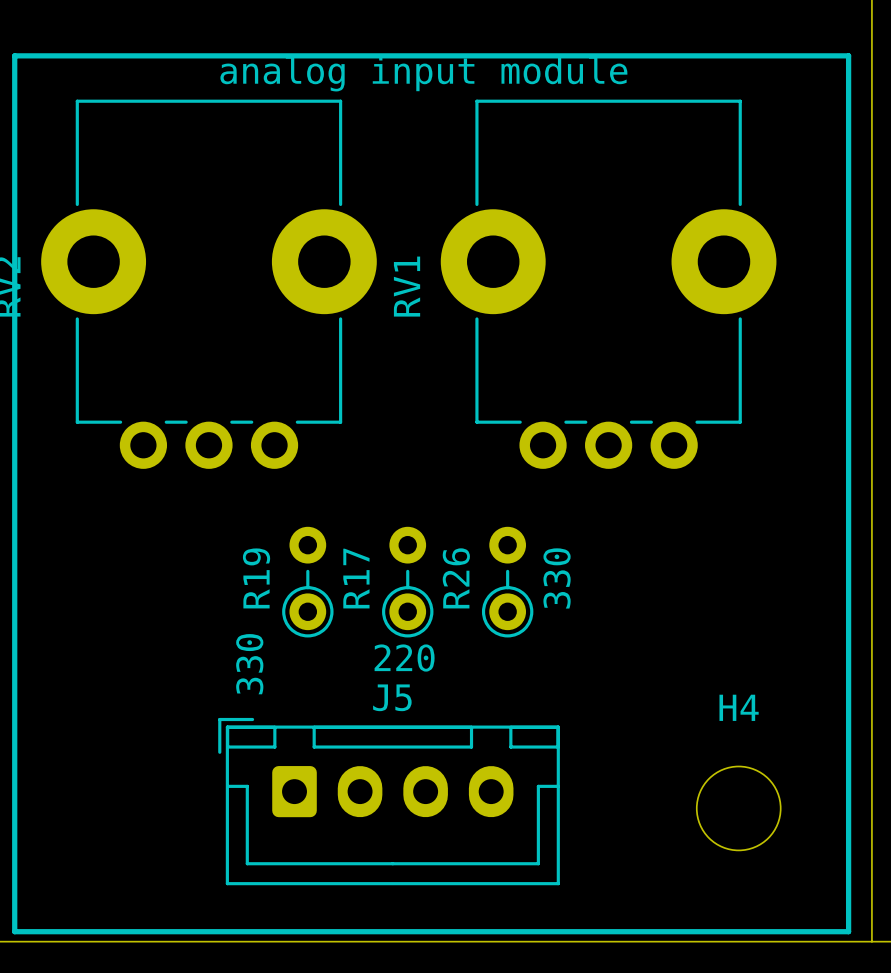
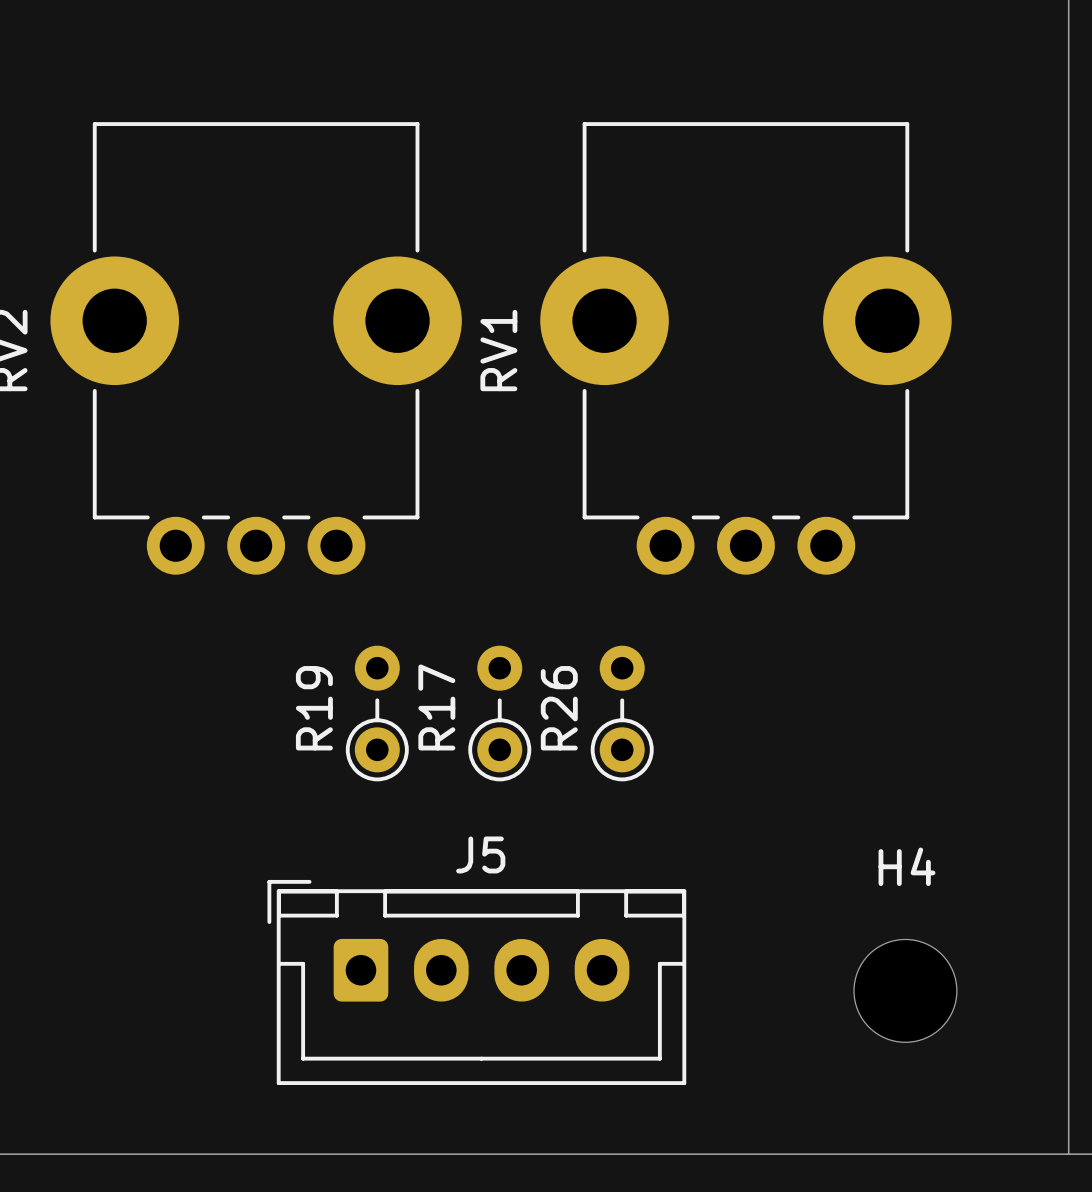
line: (14, 55) (848, 55) (848, 931) (14, 931) (14, 55) -> none
text: analog input module (423, 73) -> none
R26 value: 330 (557, 578) -> none
R17 value: 220 (404, 658) -> none
R19 value: 330 (249, 664) -> none

